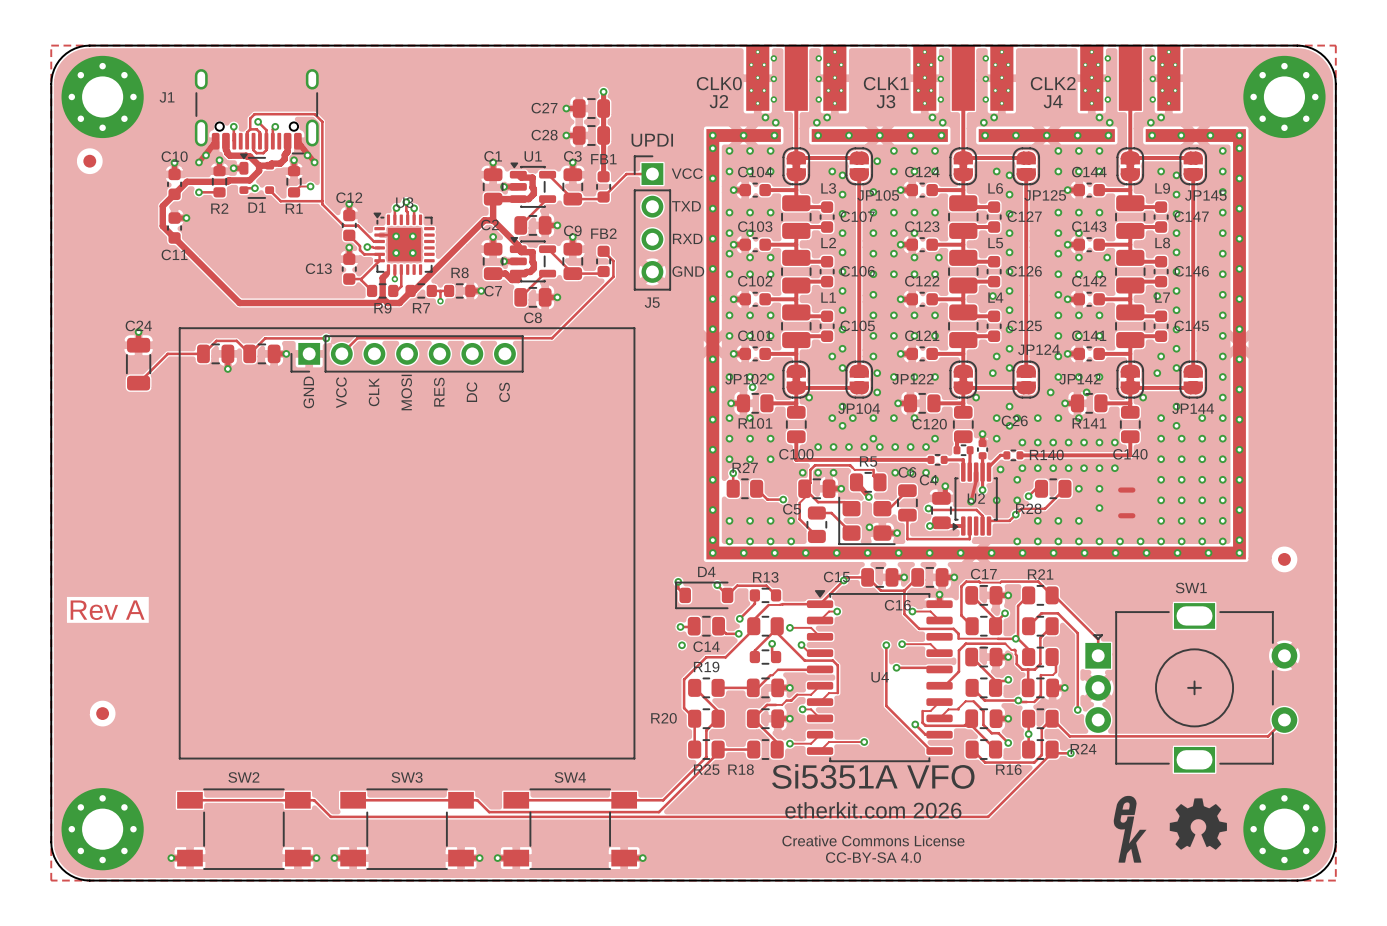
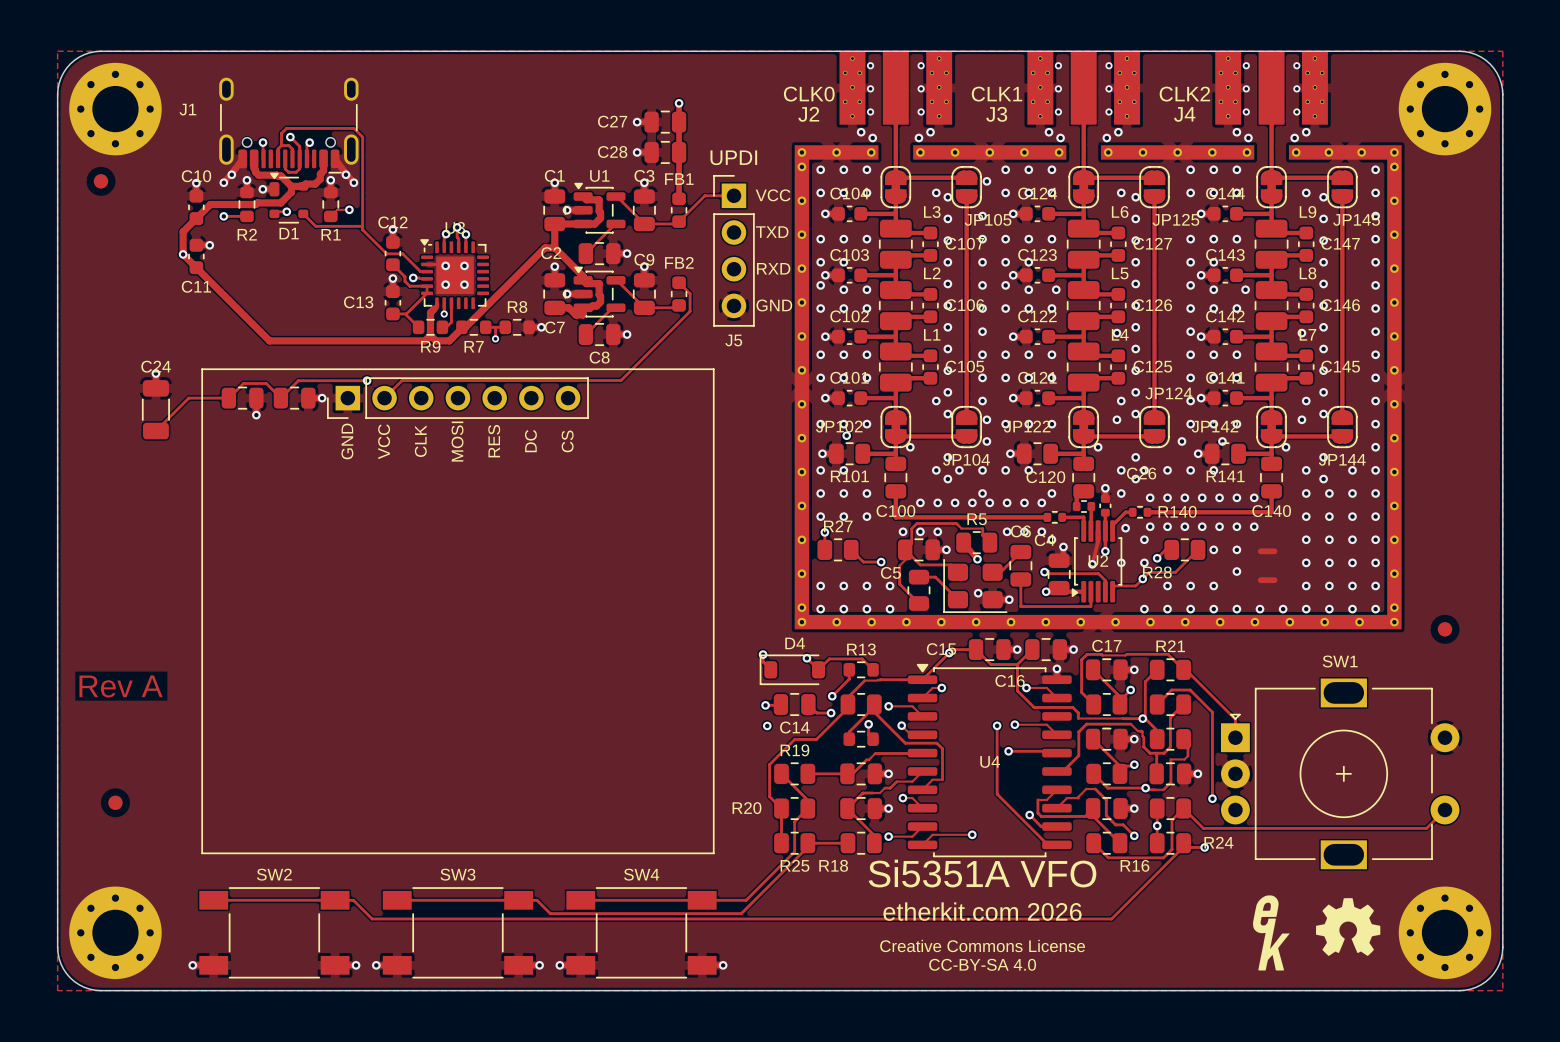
via: none -> (183, 254)

